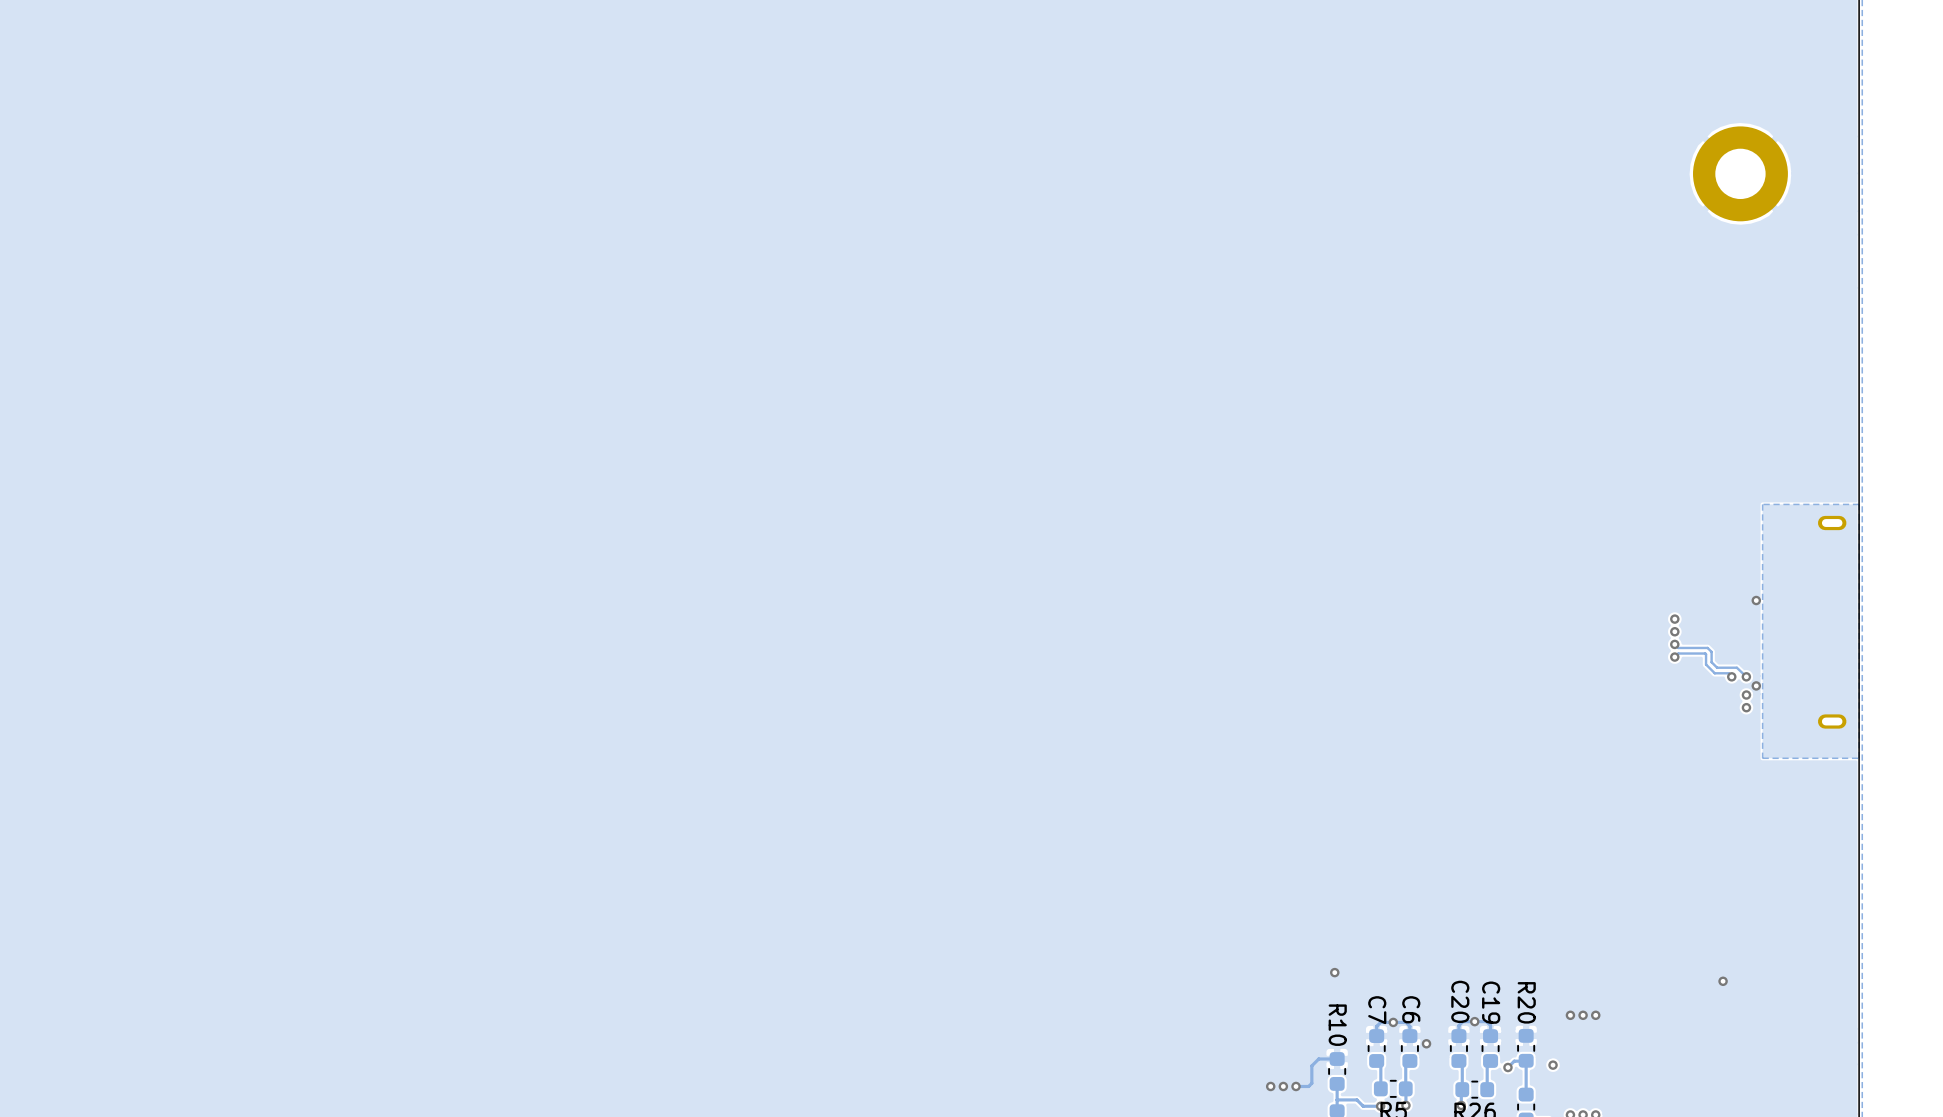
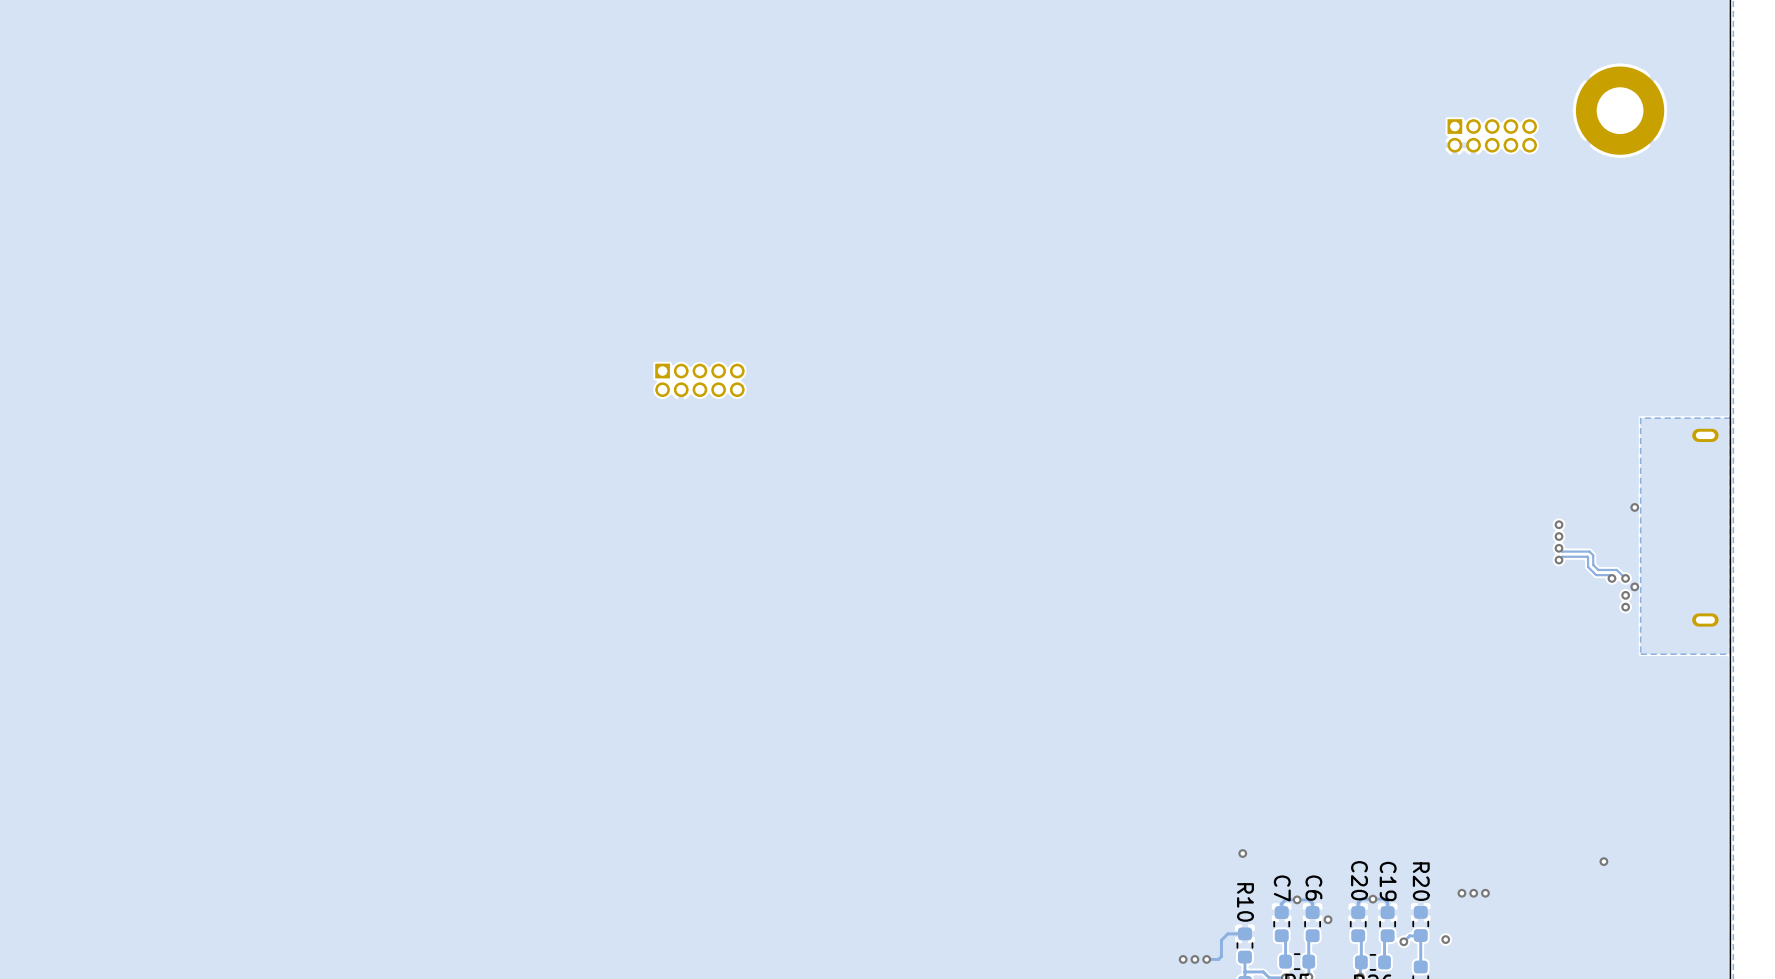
part: none -> (1492, 135)
part: none -> (699, 380)

